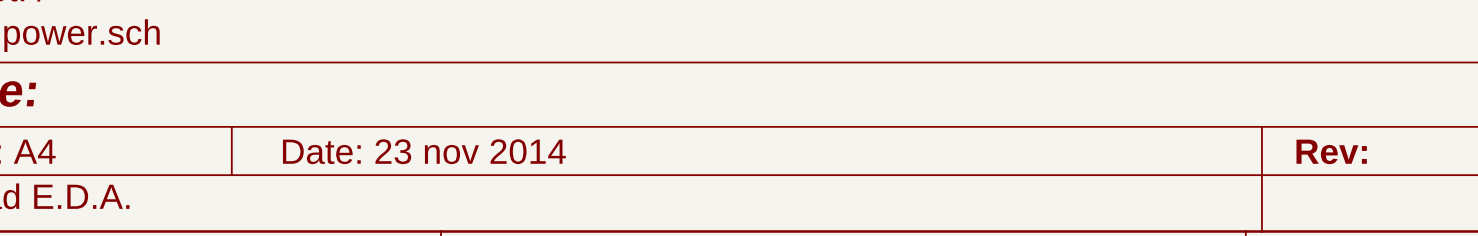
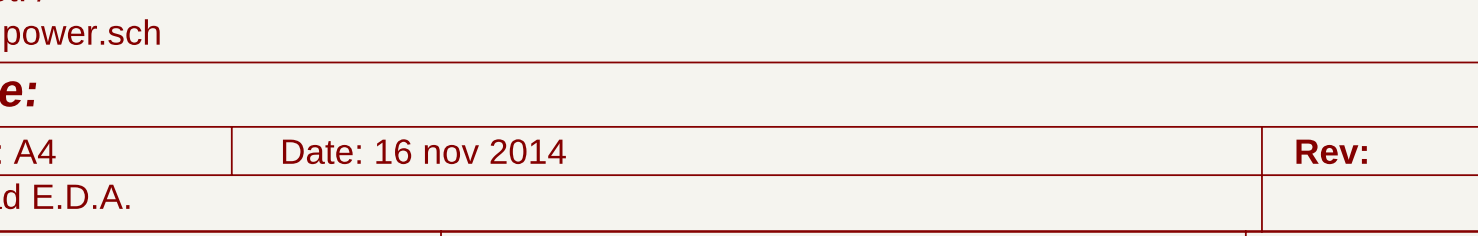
title block: Date: 23 nov 2014 (424, 151) -> Date: 16 nov 2014 (424, 151)

